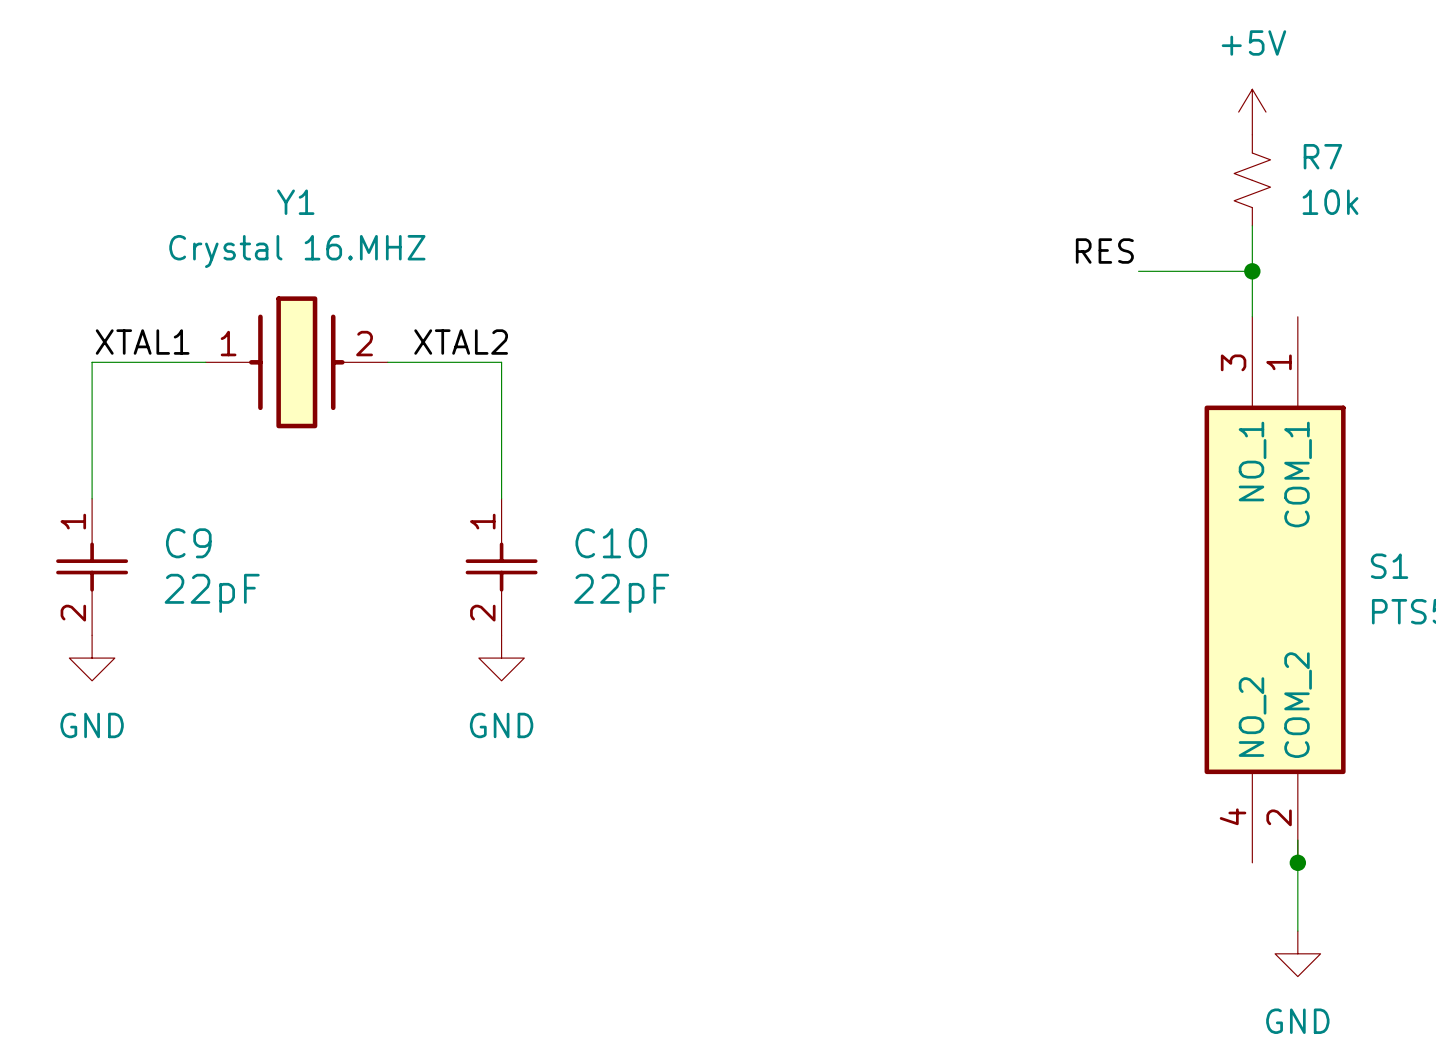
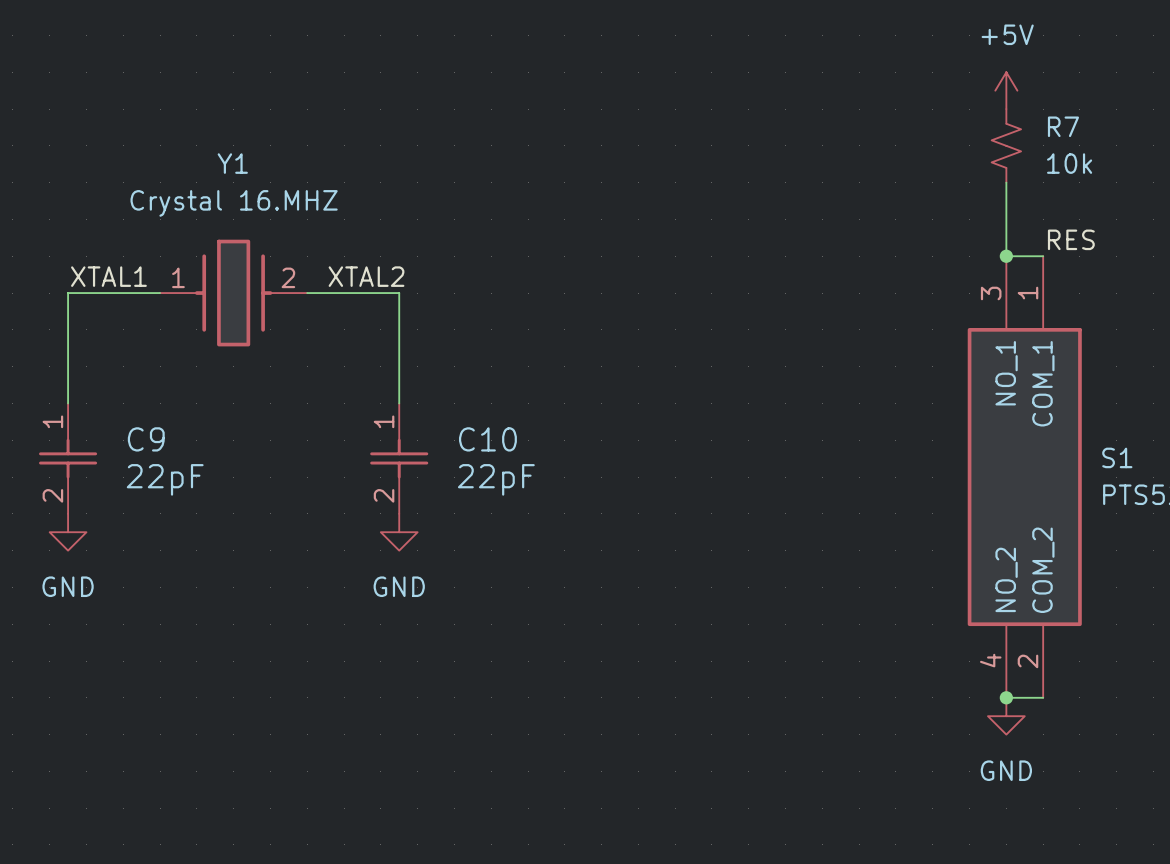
label position: RES (1104, 251) -> RES (1071, 239)
wire: (1138, 271) (1252, 271) -> none
junction position: (1252, 271) -> (1006, 256)
wire: none -> (1006, 256) (1043, 256)
wire: (1297, 840) (1297, 931) -> none
wire: none -> (1006, 697) (1043, 697)
junction position: (1297, 862) -> (1006, 697)
power symbol position: GND (1297, 953) -> GND (1006, 716)

